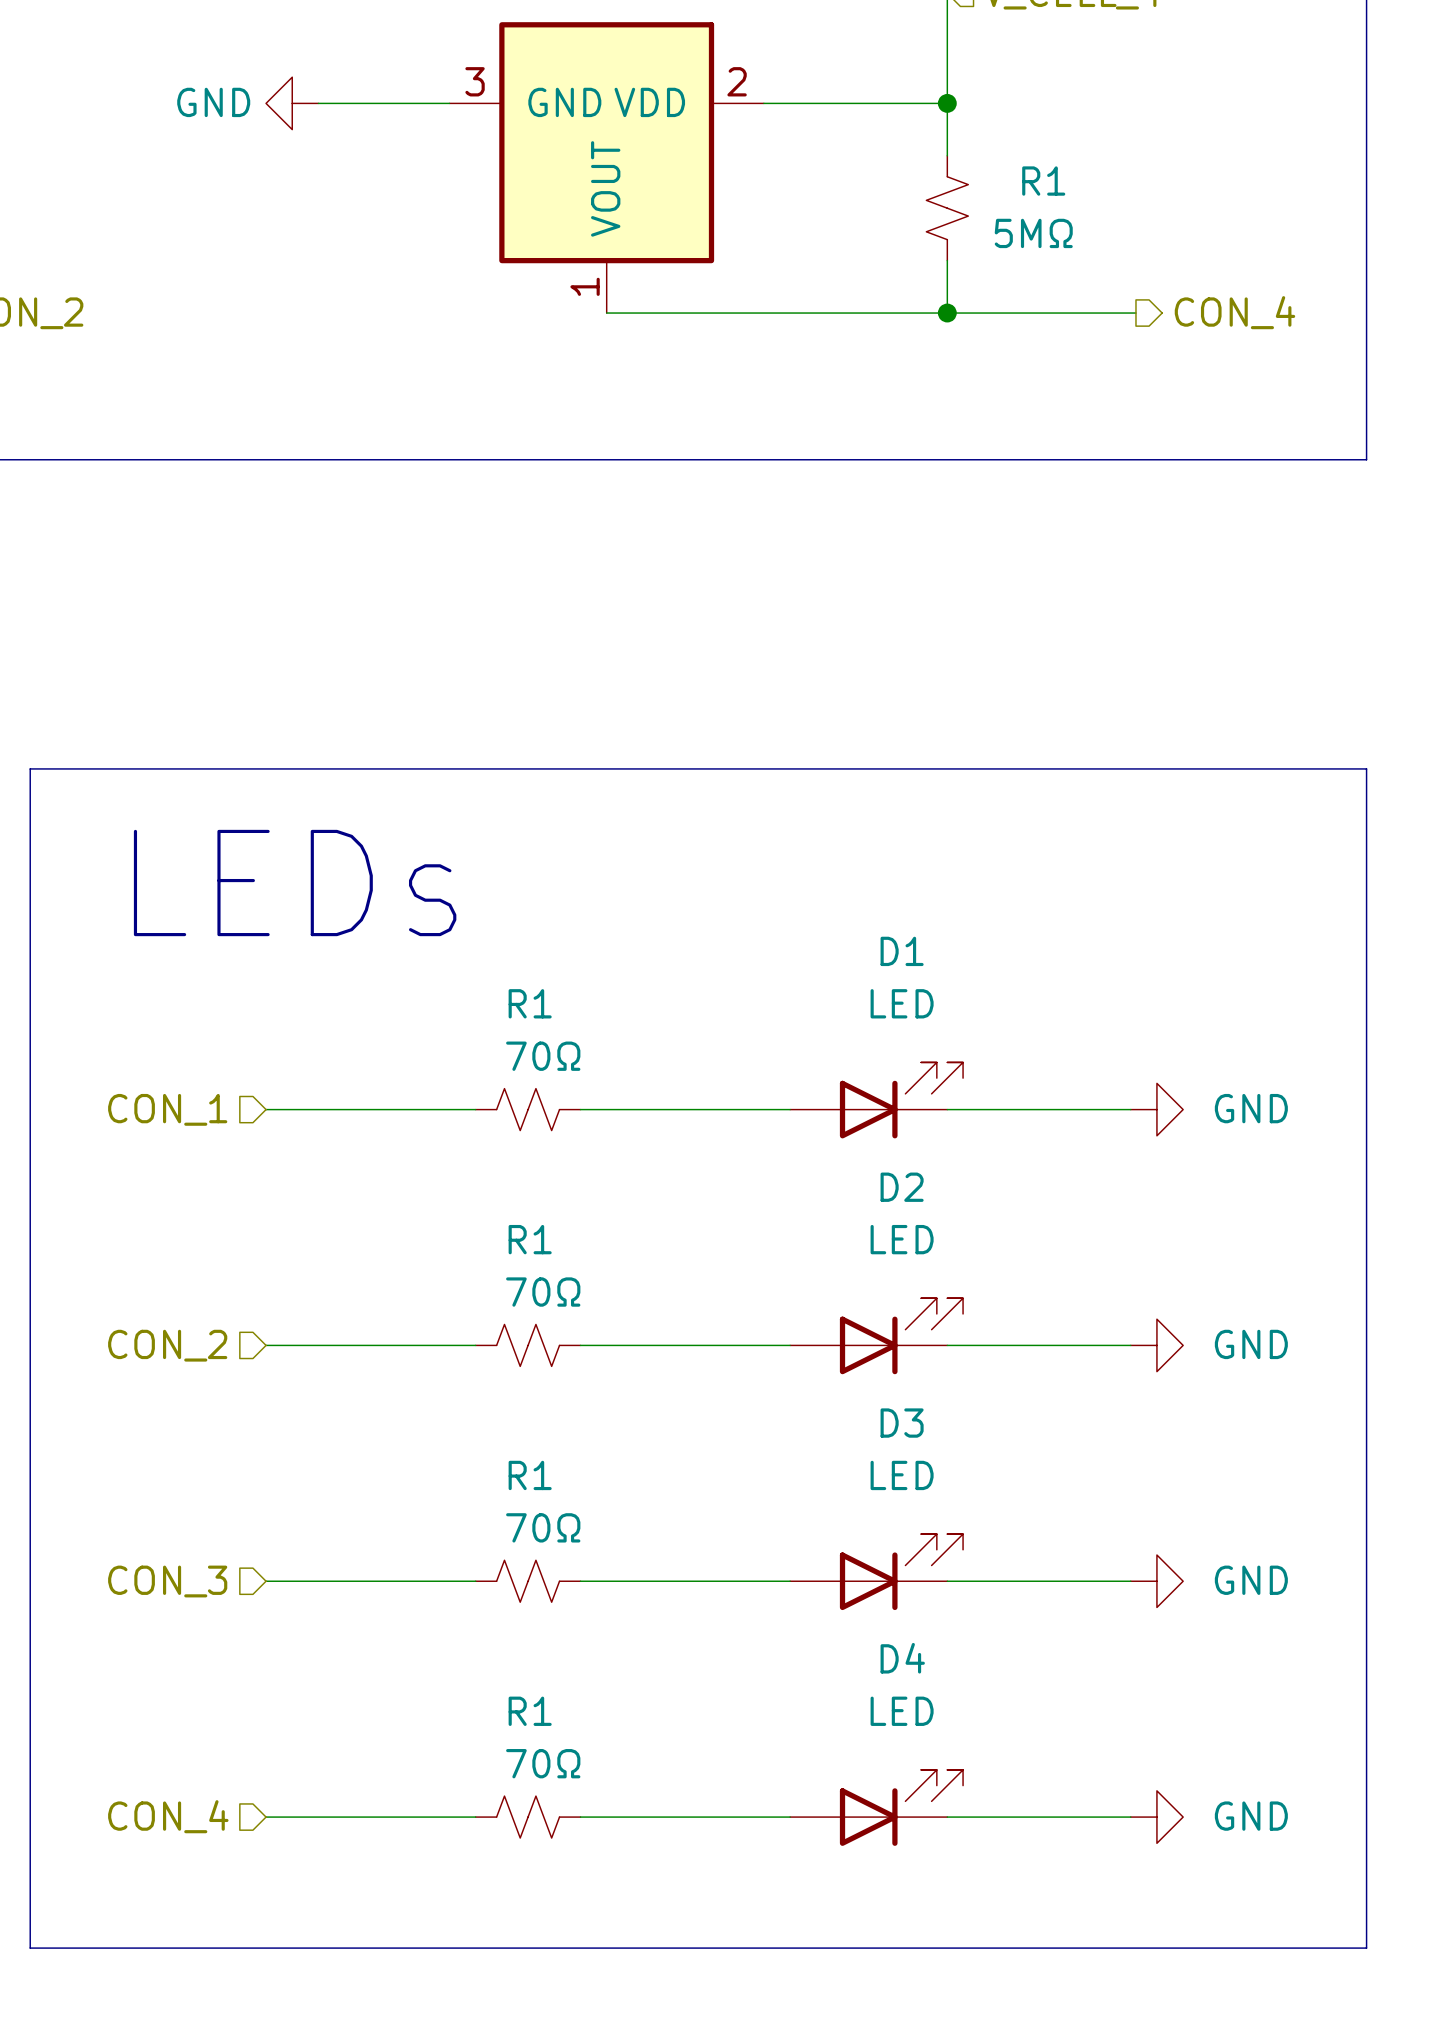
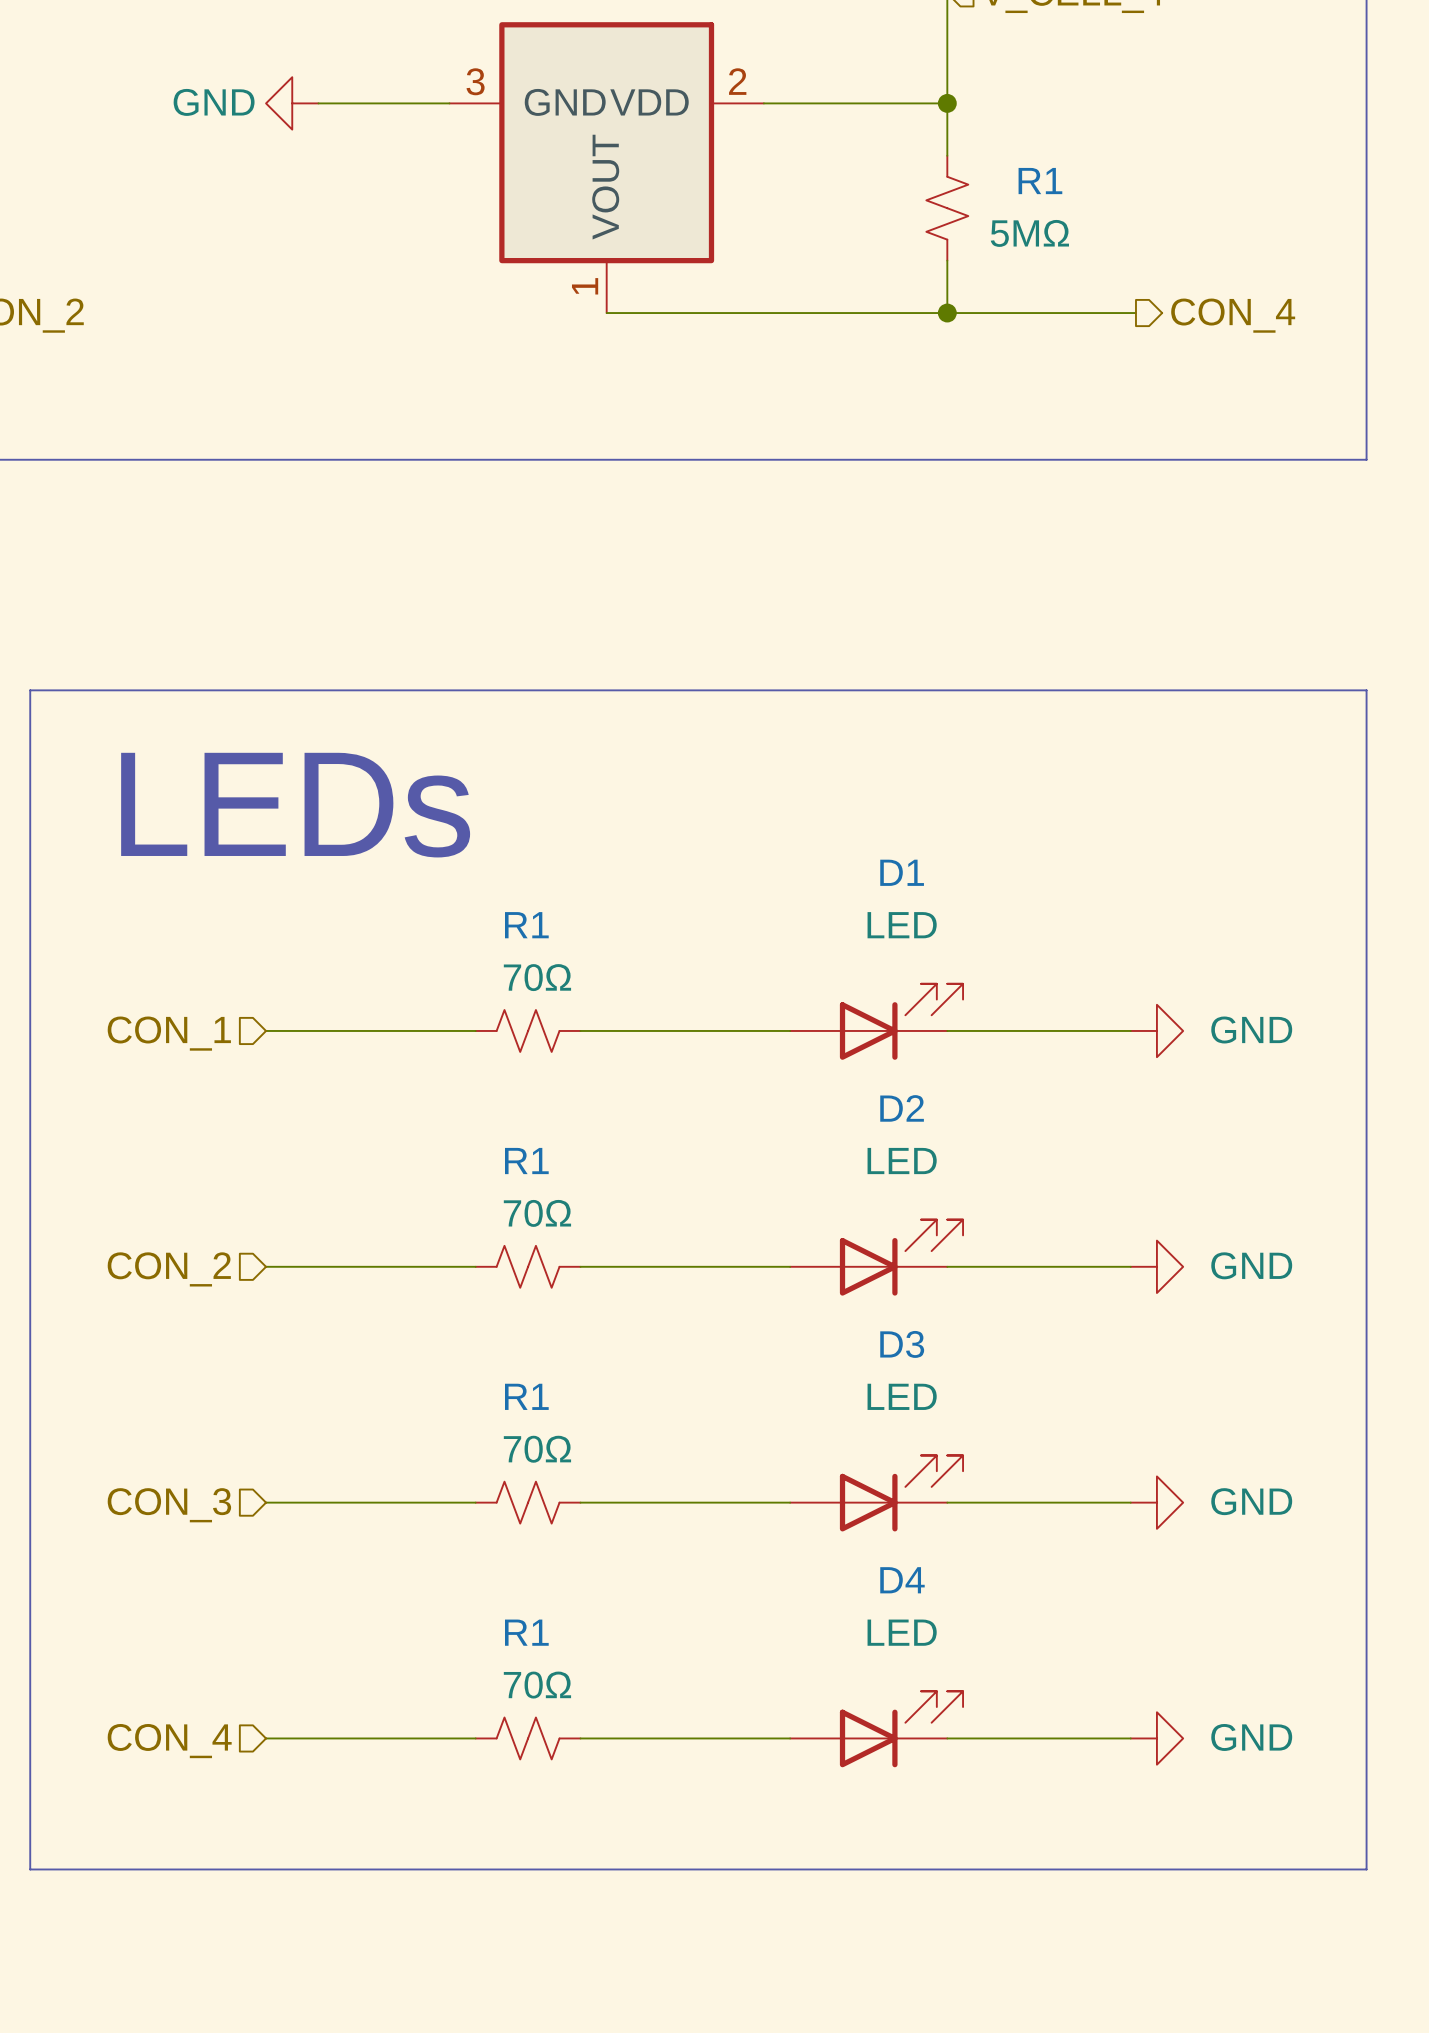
line: (30, 768) (1366, 768) -> (30, 768) (30, 690) (1366, 690) (1366, 768)
text position: LEDs (295, 883) -> LEDs (295, 805)
R1: none -> 70Ω (528, 1030)
power symbol: none -> GND (1156, 1030)
D1 position: (876, 1100) -> (876, 1021)
hierarchical label position: CON_1 (167, 1109) -> CON_1 (169, 1033)
wire: (266, 1109) (475, 1109) -> (266, 1030) (475, 1030)
R1: 70Ω (528, 1109) -> none
wire: (580, 1109) (790, 1109) -> (580, 1030) (790, 1030)
wire: (947, 1109) (1130, 1109) -> (947, 1030) (1130, 1030)
power symbol: GND (1156, 1109) -> none
R1: none -> 70Ω (528, 1266)
power symbol: none -> GND (1156, 1266)
D2 position: (876, 1336) -> (876, 1257)
hierarchical label position: CON_2 (167, 1345) -> CON_2 (169, 1269)
wire: (266, 1345) (475, 1345) -> (266, 1266) (475, 1266)
R1: 70Ω (528, 1345) -> none
wire: (580, 1345) (790, 1345) -> (580, 1266) (790, 1266)
wire: (947, 1345) (1130, 1345) -> (947, 1266) (1130, 1266)
power symbol: GND (1156, 1345) -> none
R1: none -> 70Ω (528, 1502)
power symbol: none -> GND (1156, 1502)
D3 position: (876, 1572) -> (876, 1493)
hierarchical label position: CON_3 (167, 1581) -> CON_3 (169, 1505)
wire: (266, 1581) (475, 1581) -> (266, 1502) (475, 1502)
R1: 70Ω (528, 1581) -> none
wire: (580, 1581) (790, 1581) -> (580, 1502) (790, 1502)
wire: (947, 1581) (1130, 1581) -> (947, 1502) (1130, 1502)
power symbol: GND (1156, 1581) -> none
R1: none -> 70Ω (528, 1738)
power symbol: none -> GND (1156, 1738)
D4 position: (876, 1807) -> (876, 1729)
hierarchical label position: CON_4 (168, 1816) -> CON_4 (169, 1741)
wire: (266, 1817) (475, 1817) -> (266, 1738) (475, 1738)
R1: 70Ω (528, 1817) -> none
wire: (580, 1817) (790, 1817) -> (580, 1738) (790, 1738)
wire: (947, 1817) (1130, 1817) -> (947, 1738) (1130, 1738)
power symbol: GND (1156, 1817) -> none
line: (30, 1869) (30, 1948) (1366, 1948) (1366, 1869) -> (30, 1869) (1366, 1869)

